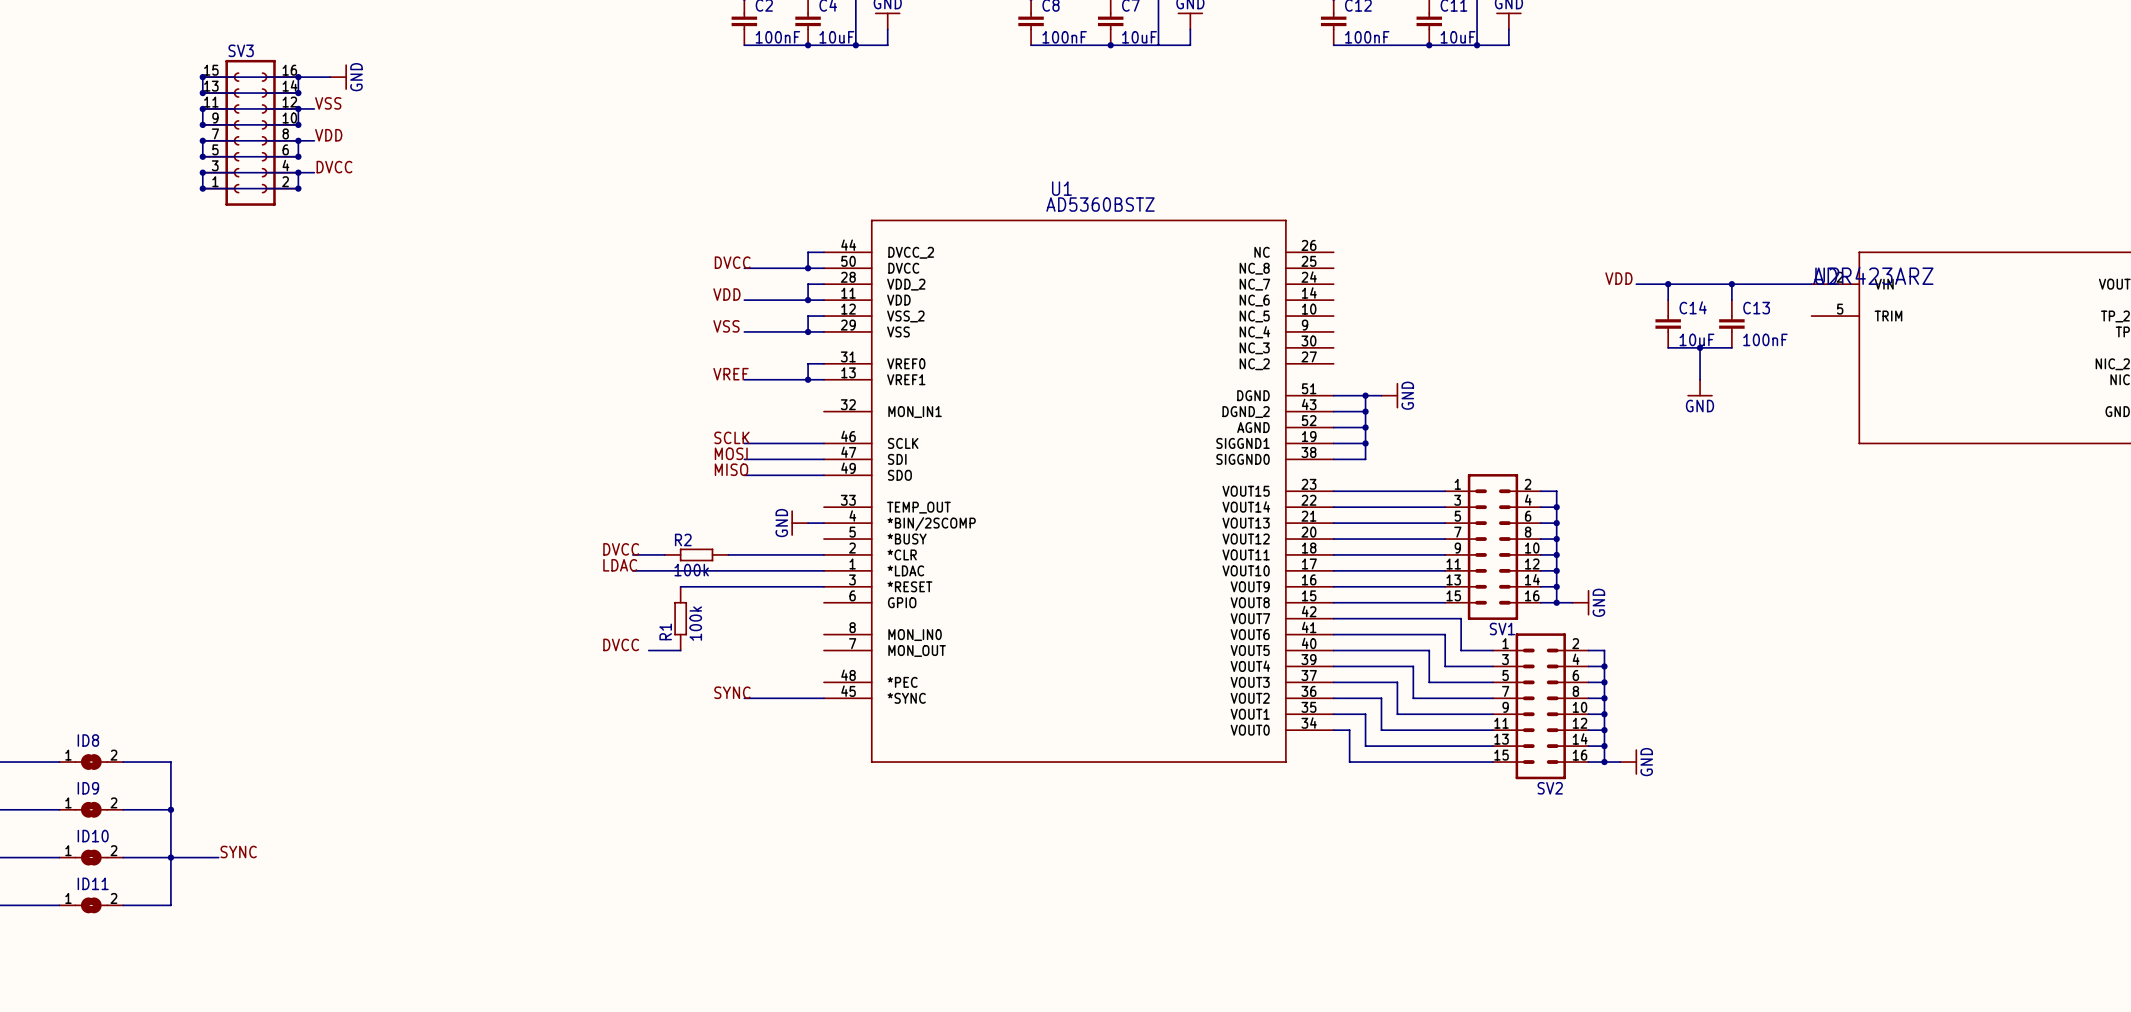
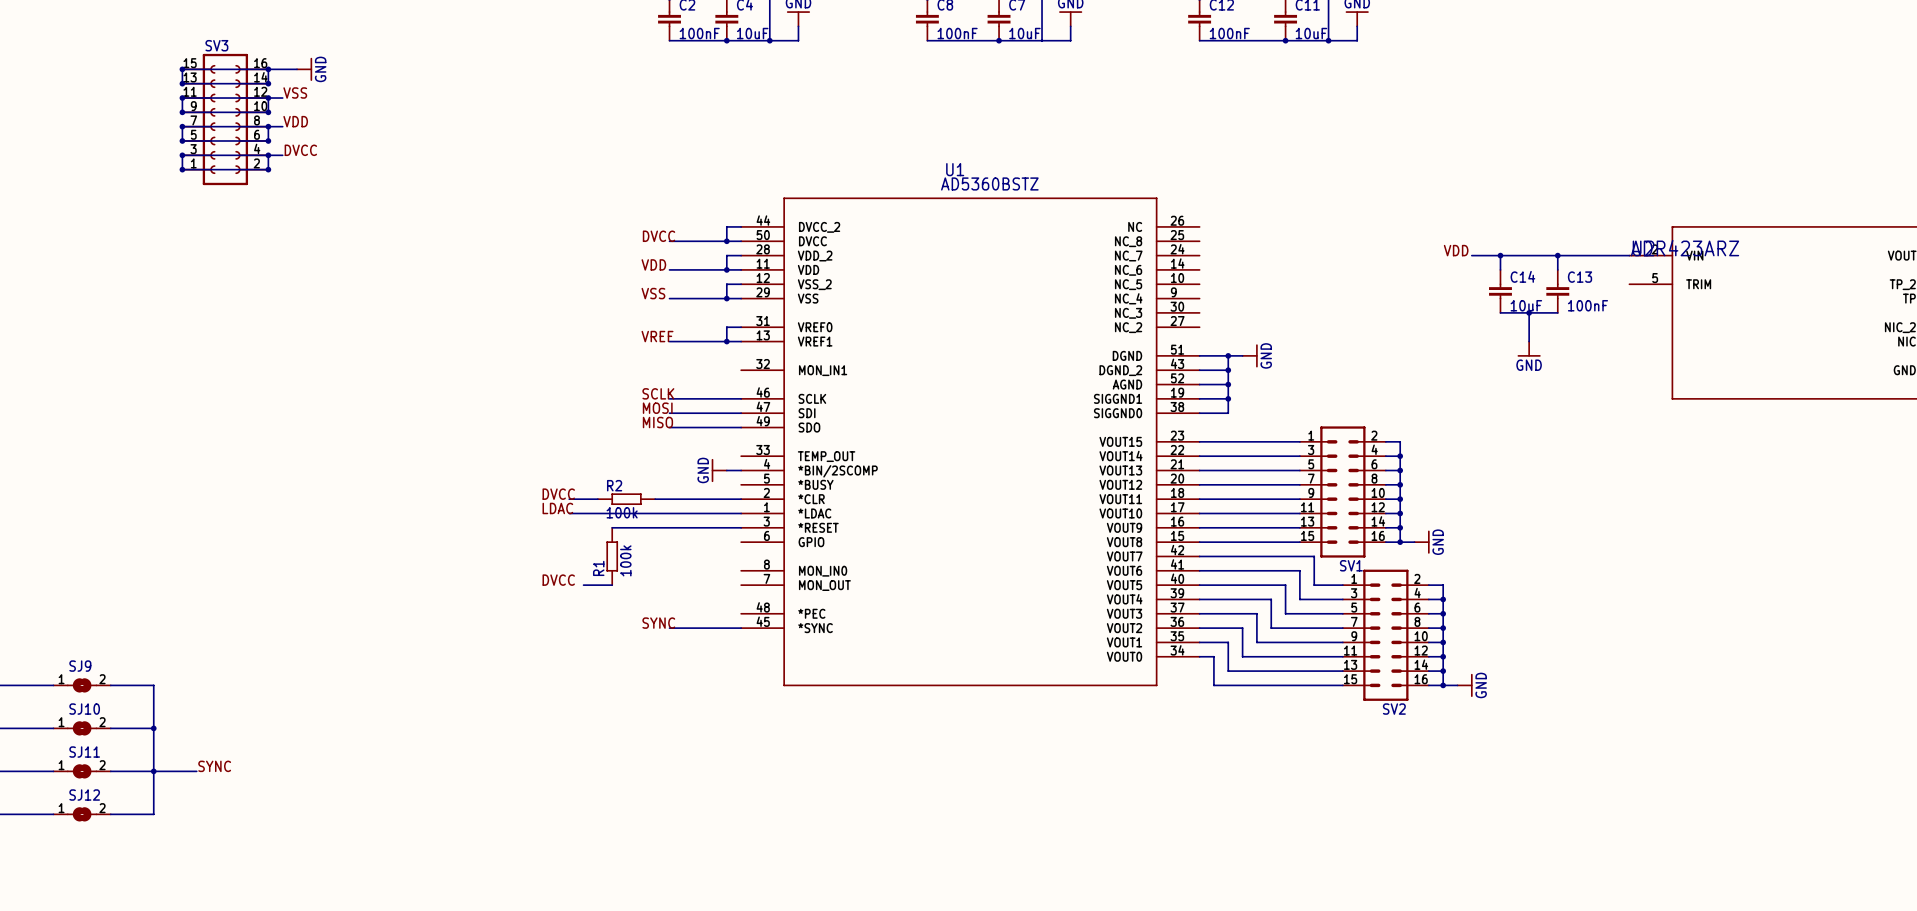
ID8 name: ID8 (88, 740) -> SJ9 (80, 666)
ID9 name: ID9 (88, 788) -> SJ10 (84, 709)
ID10 name: ID10 (93, 836) -> SJ11 (84, 752)
ID11 name: ID11 (93, 883) -> SJ12 (84, 795)

